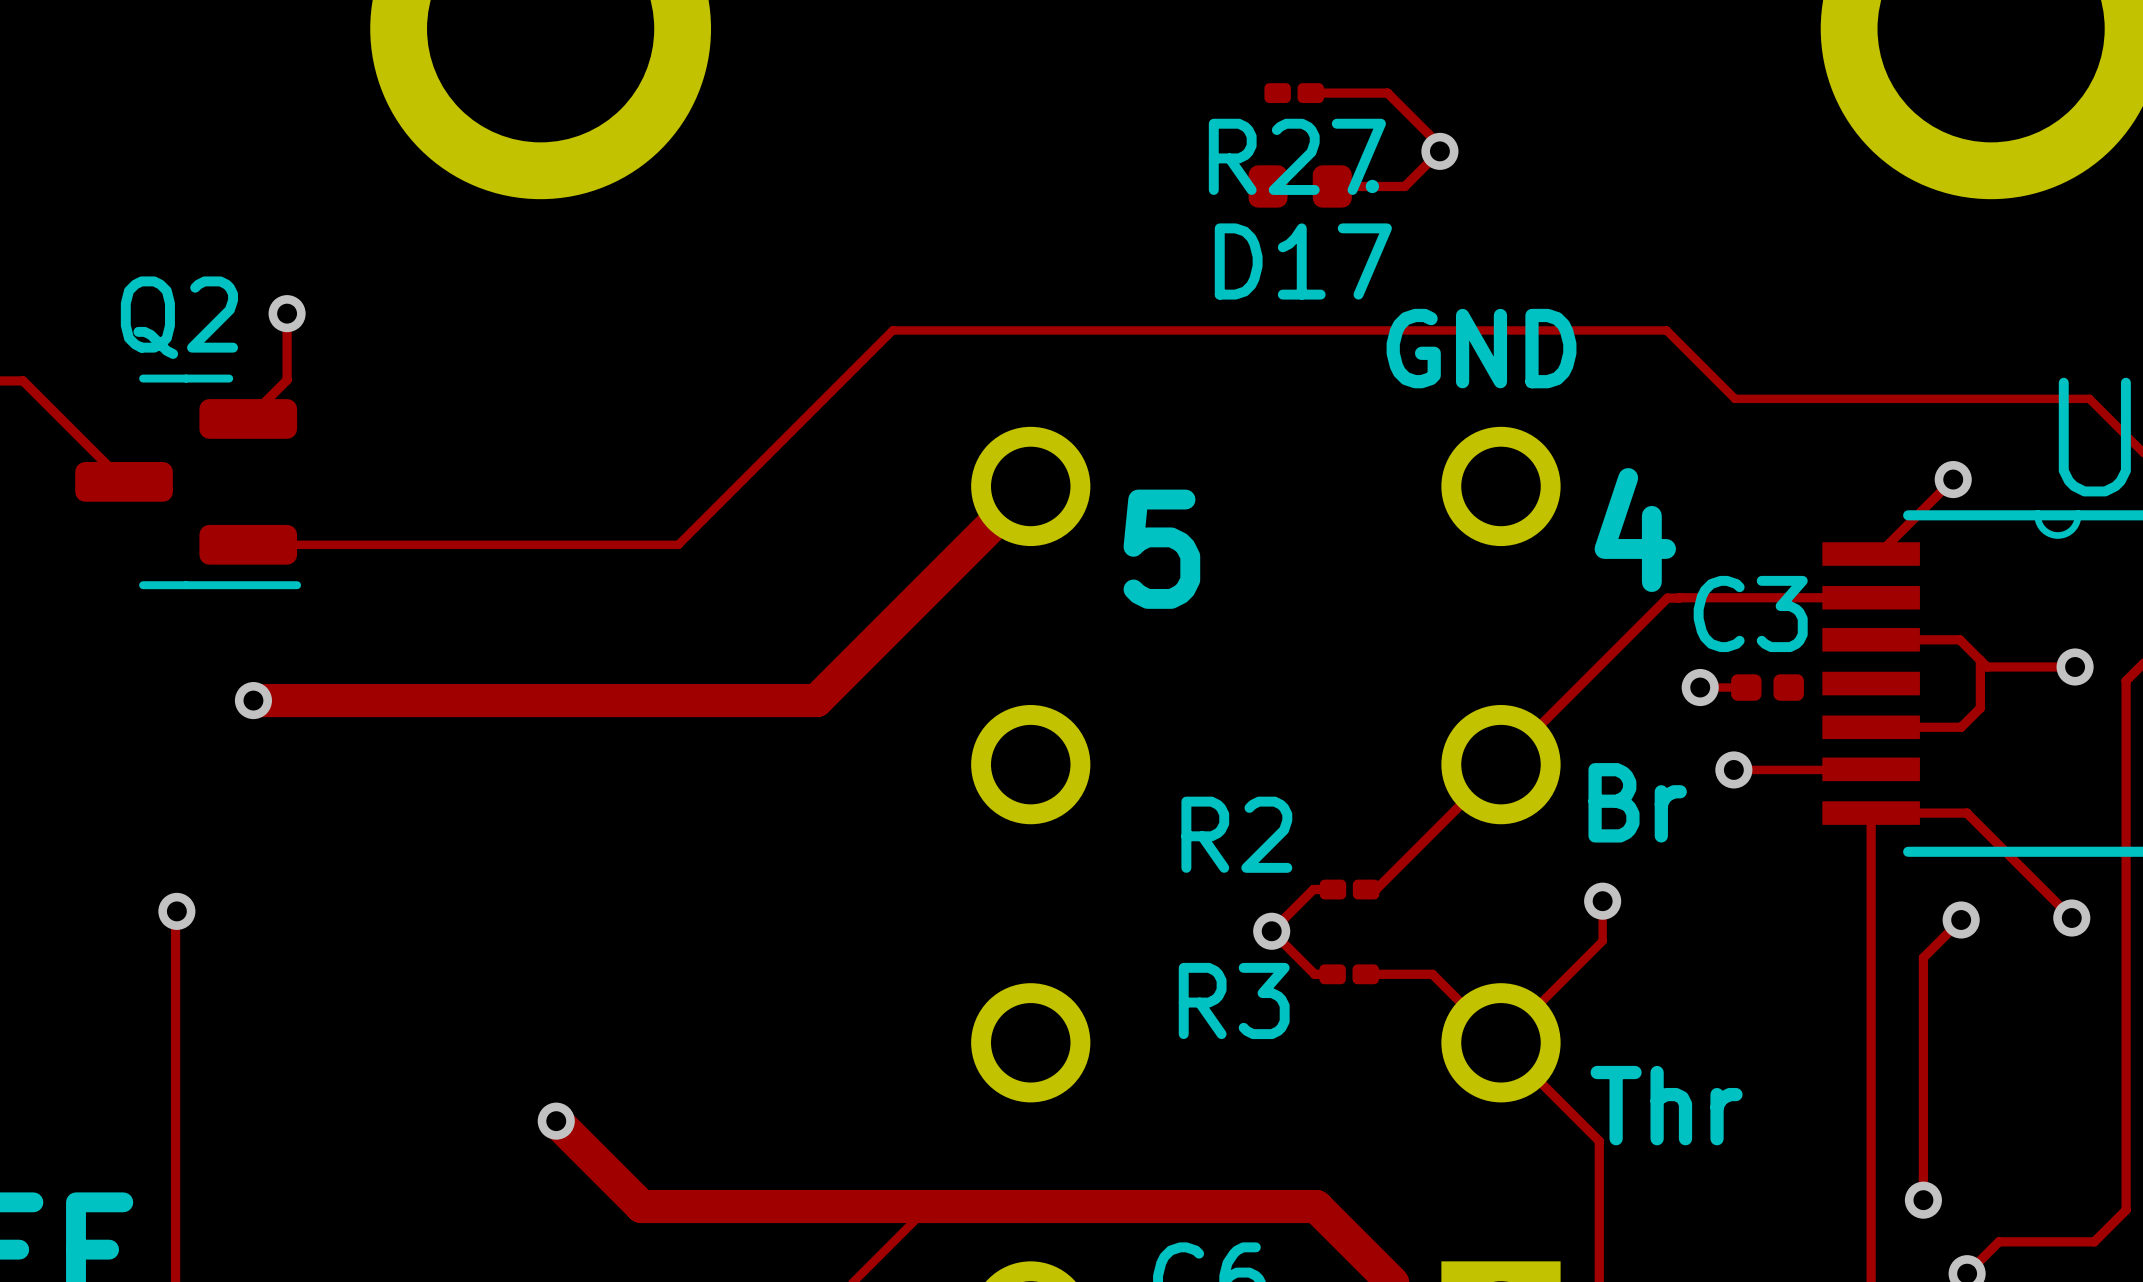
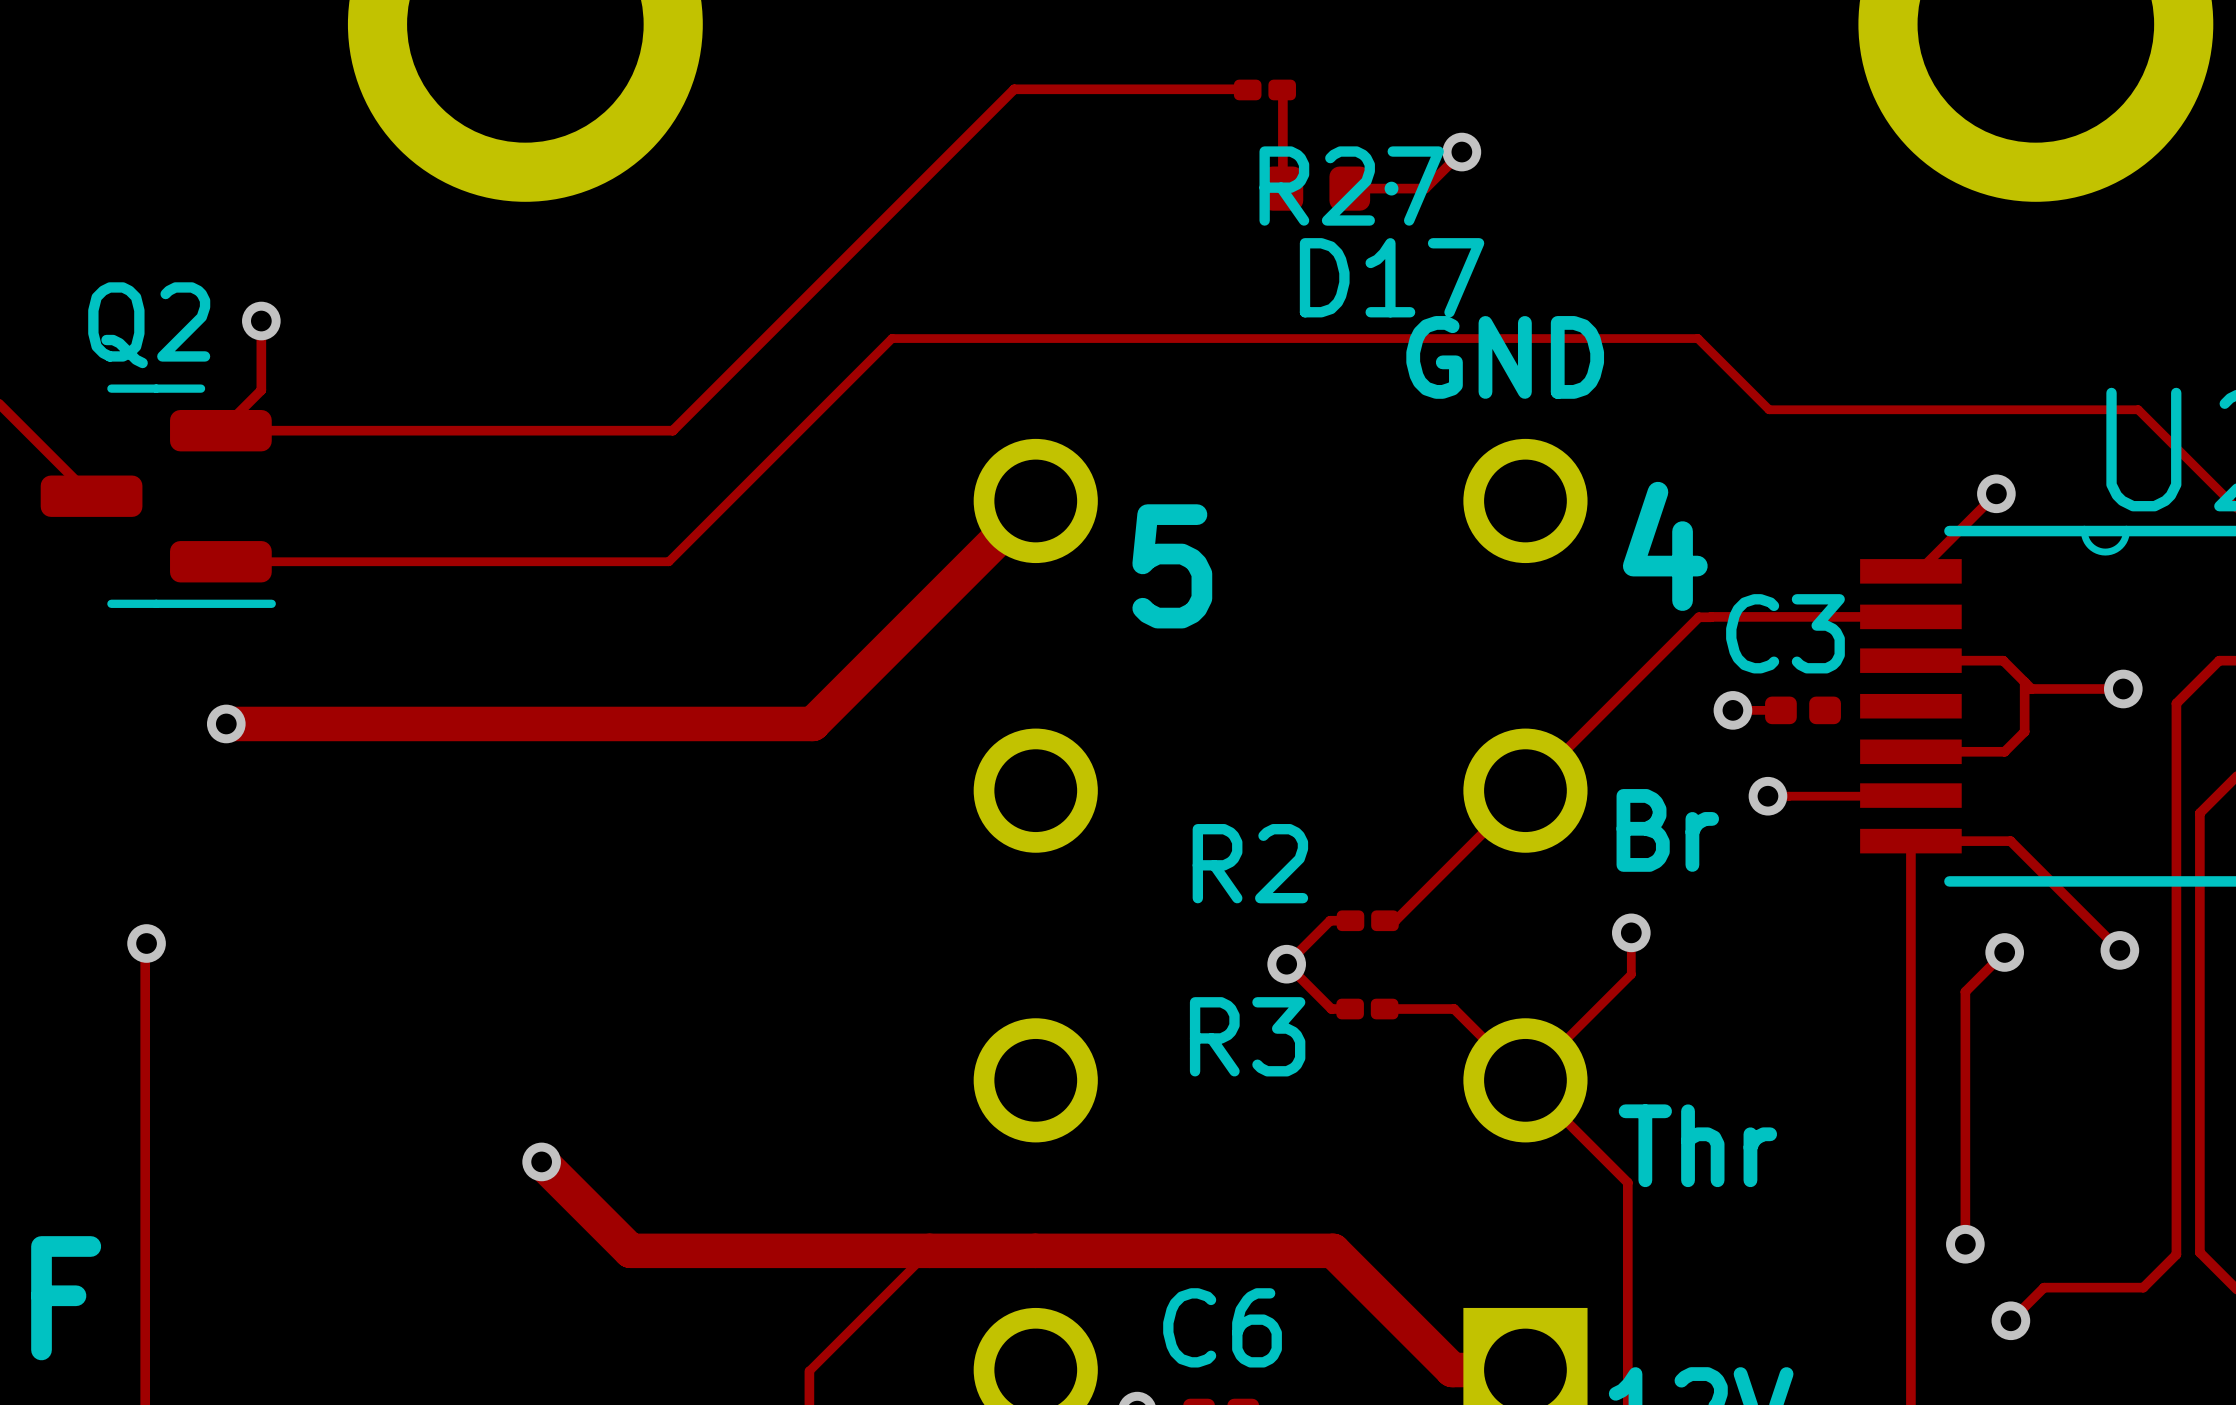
track: none -> (1247, 89) (1014, 89) (672, 430) (220, 430)
track: none -> (1282, 90) (1282, 188)
R27 position: (1294, 93) -> (1264, 89)
track: (1310, 93) (1387, 93) (1439, 145) -> none
R27 name position: R27 (1297, 156) -> R27 (1351, 186)
D17 name position: D17 (1303, 261) -> D17 (1392, 277)

